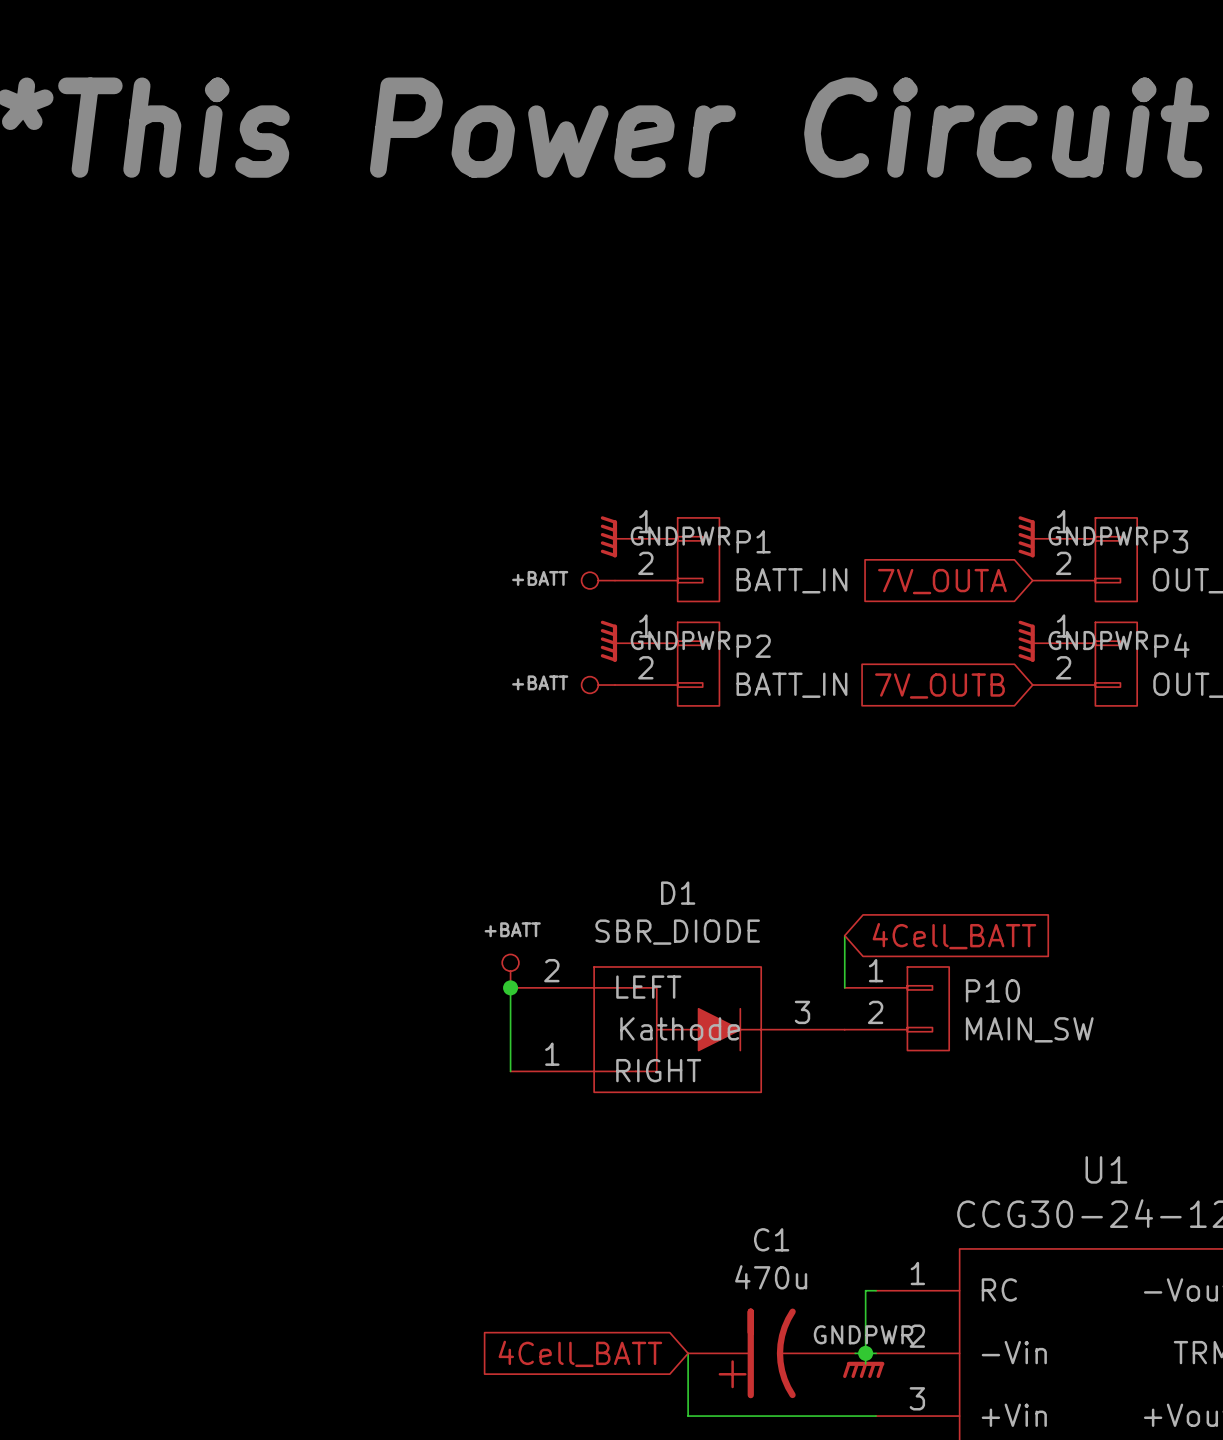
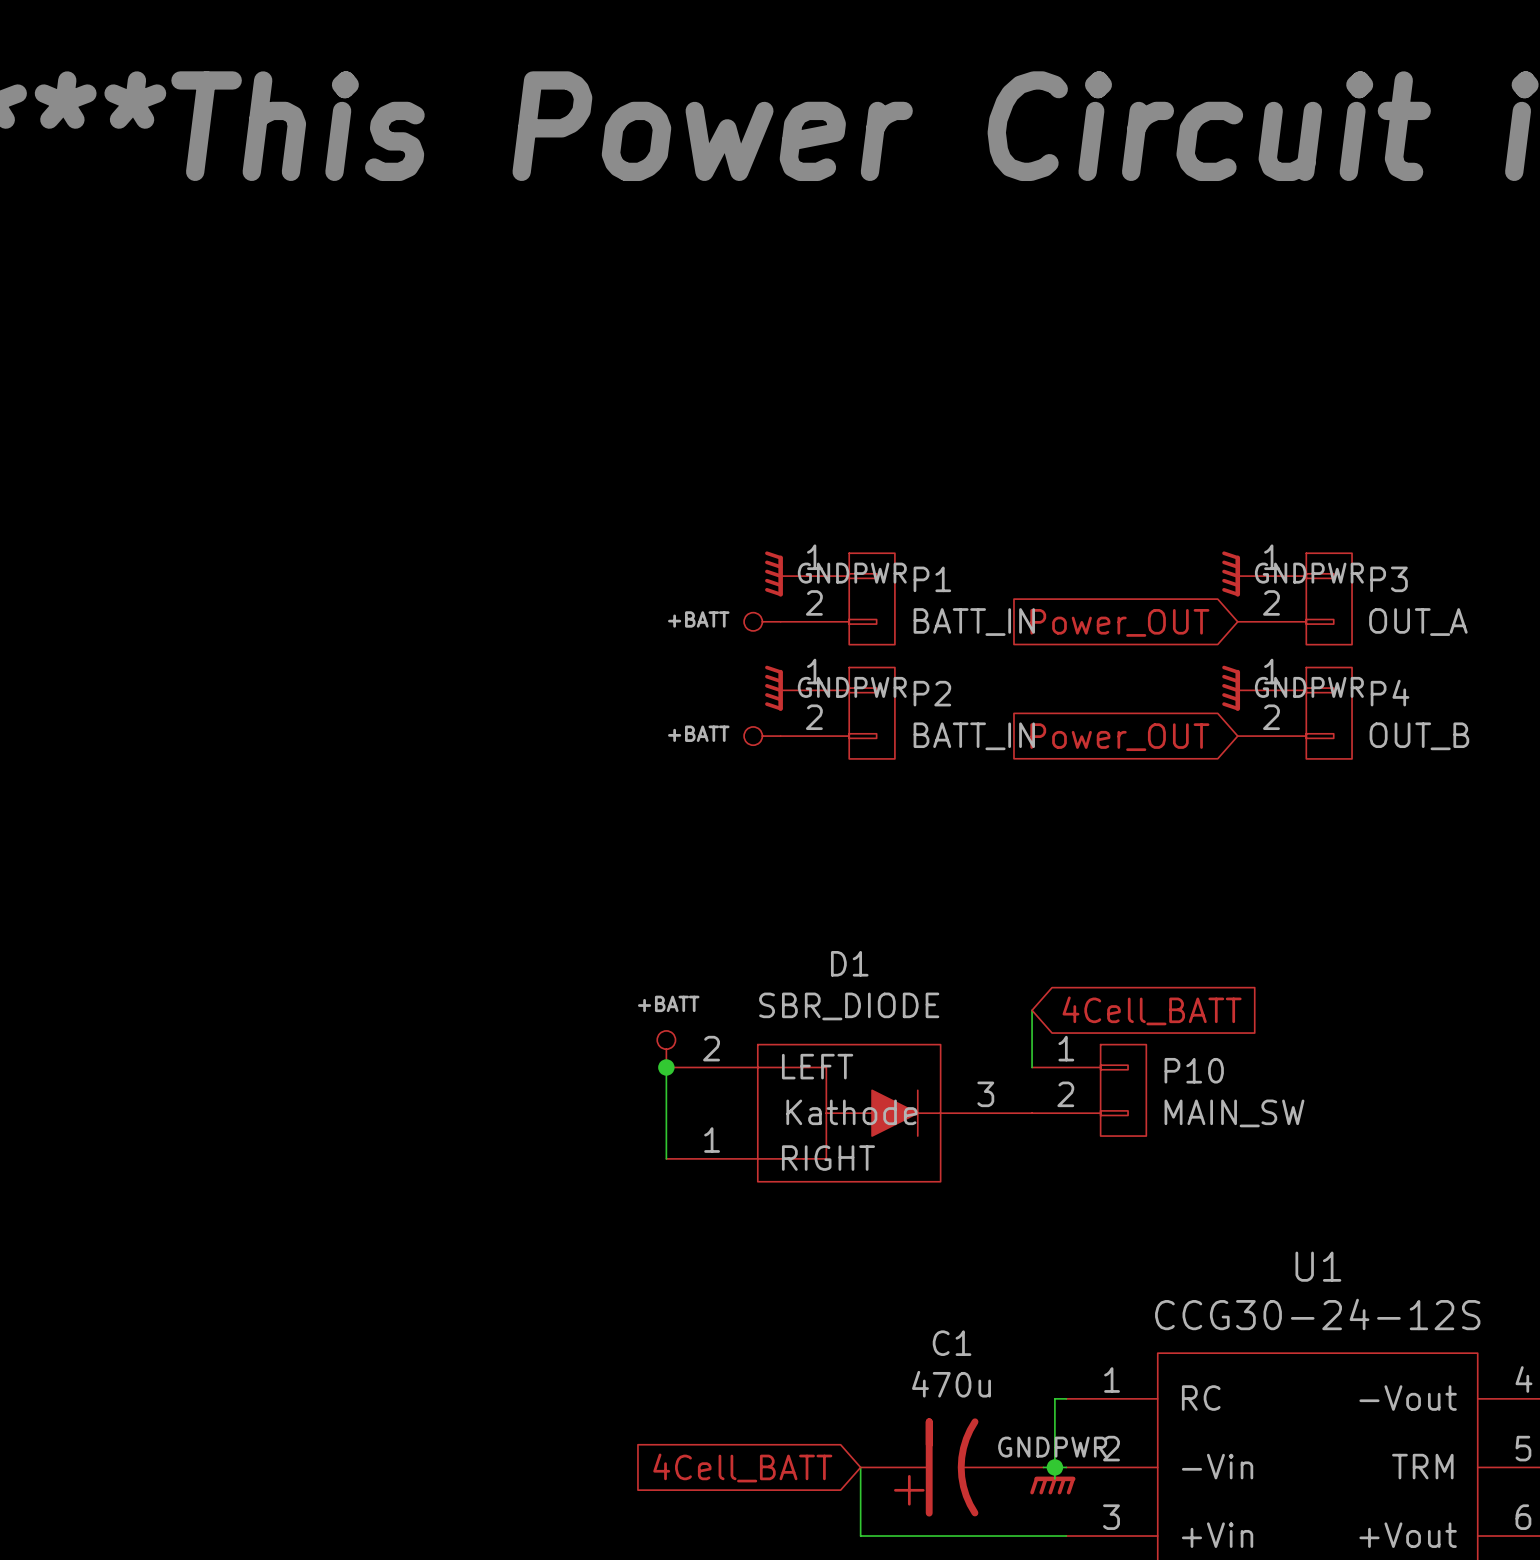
global label: 7V_OUTA (942, 581) -> Power_OUT (1119, 622)
global label: 7V_OUTB (939, 686) -> Power_OUT (1119, 737)

